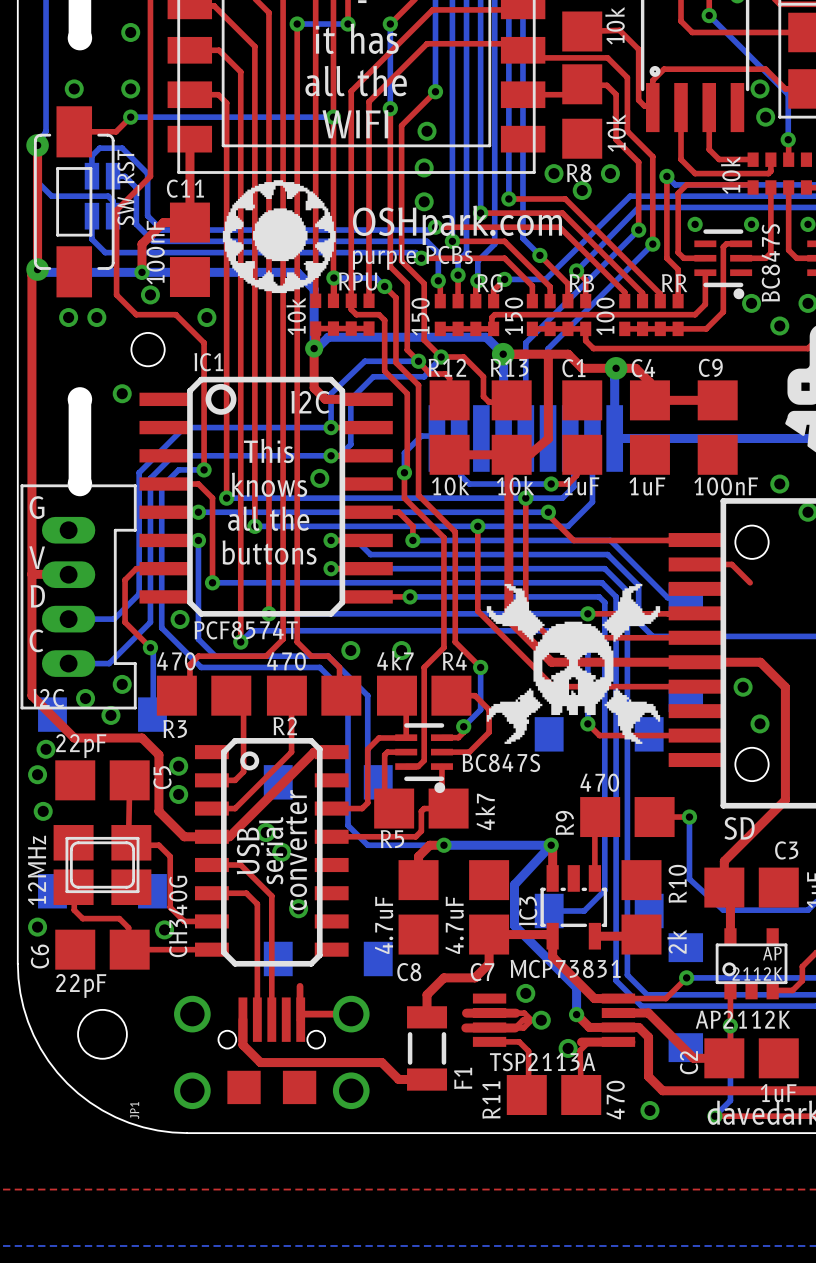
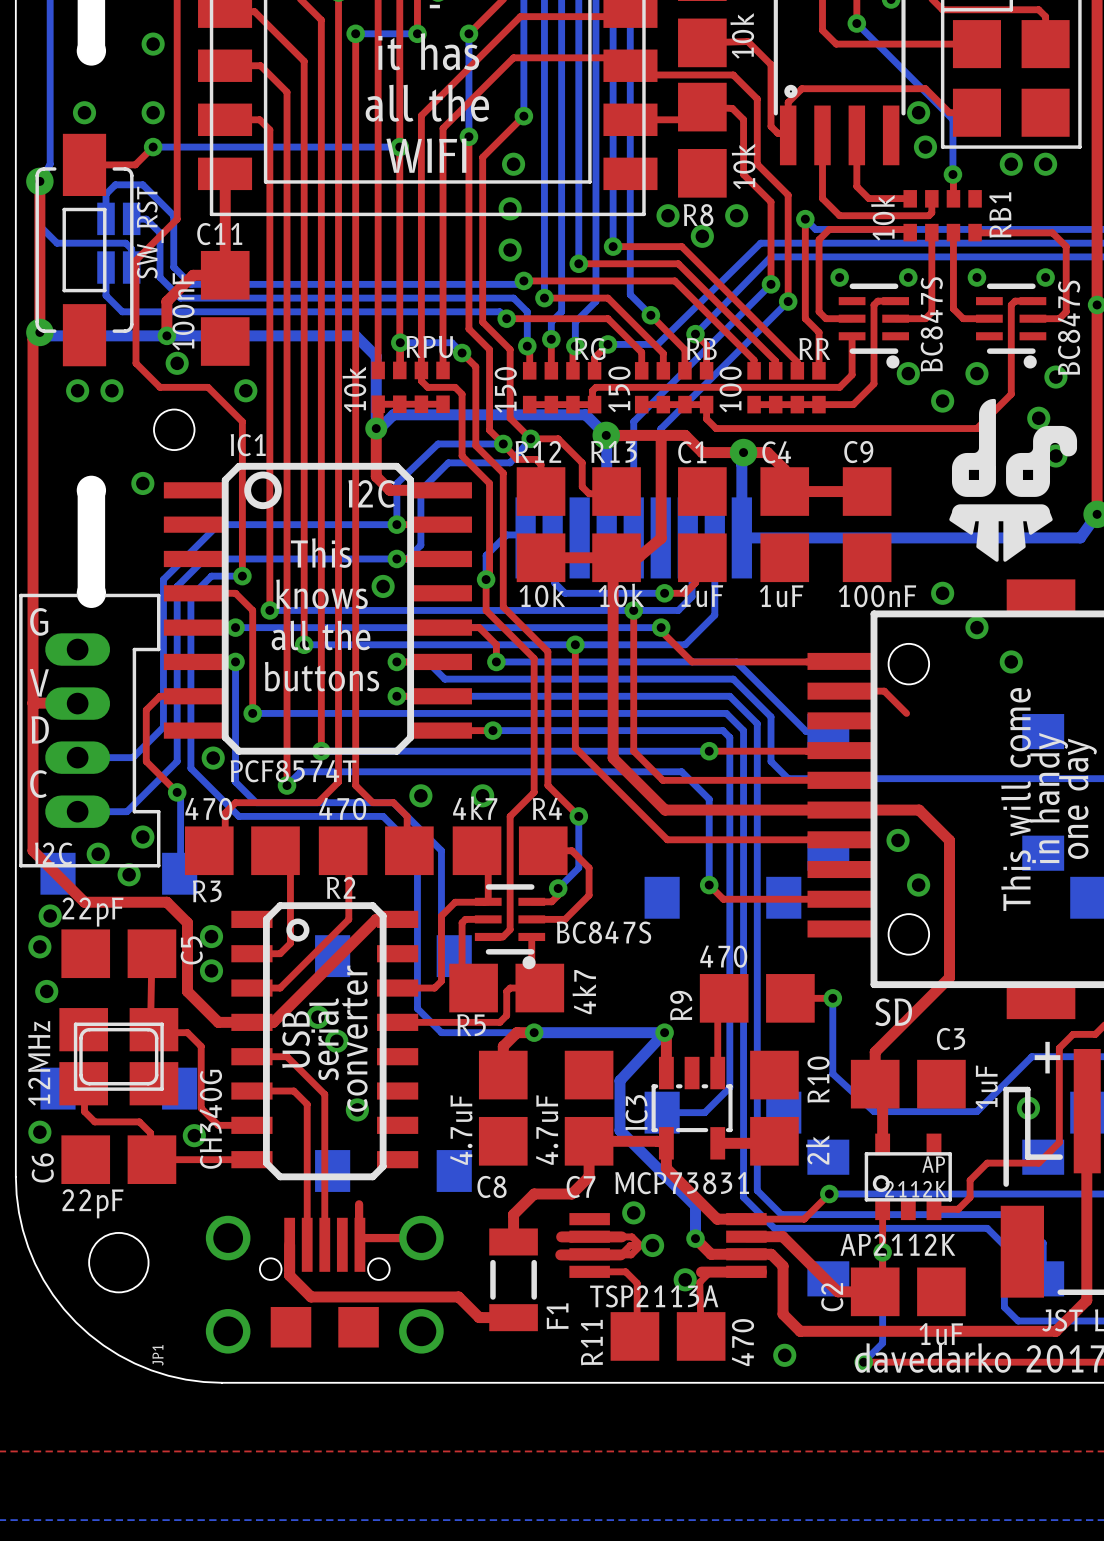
drawing: [222, 180, 336, 294] -> none
drawing: [486, 583, 661, 744] -> none

